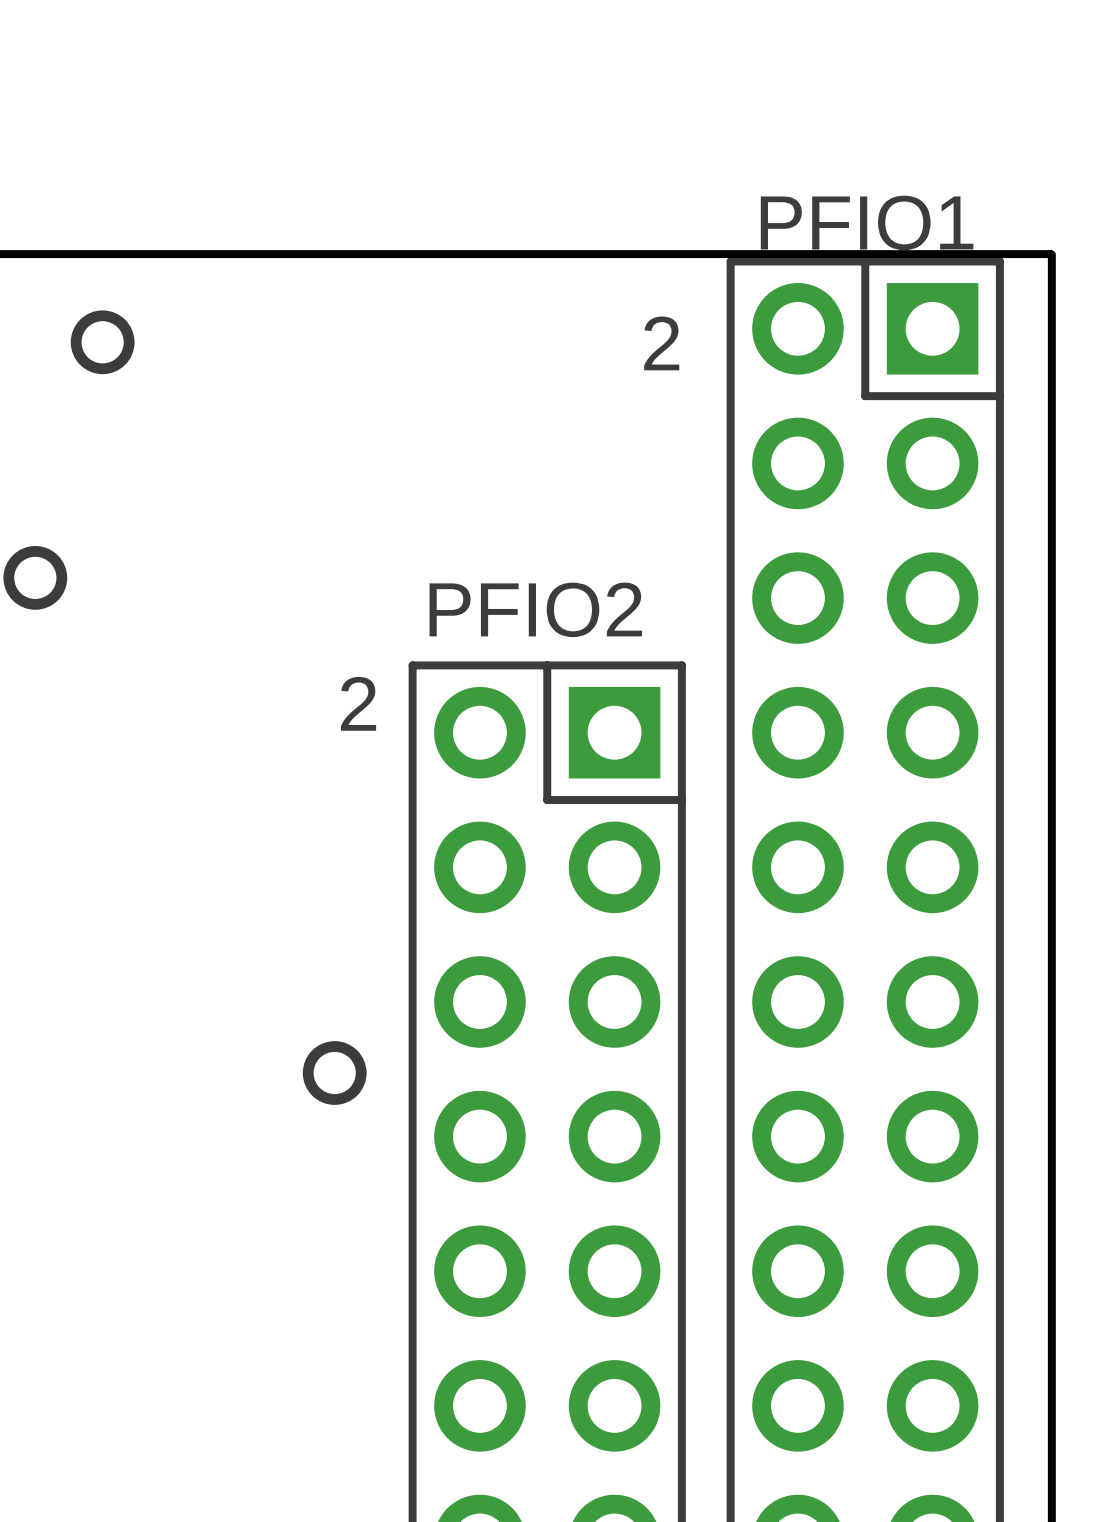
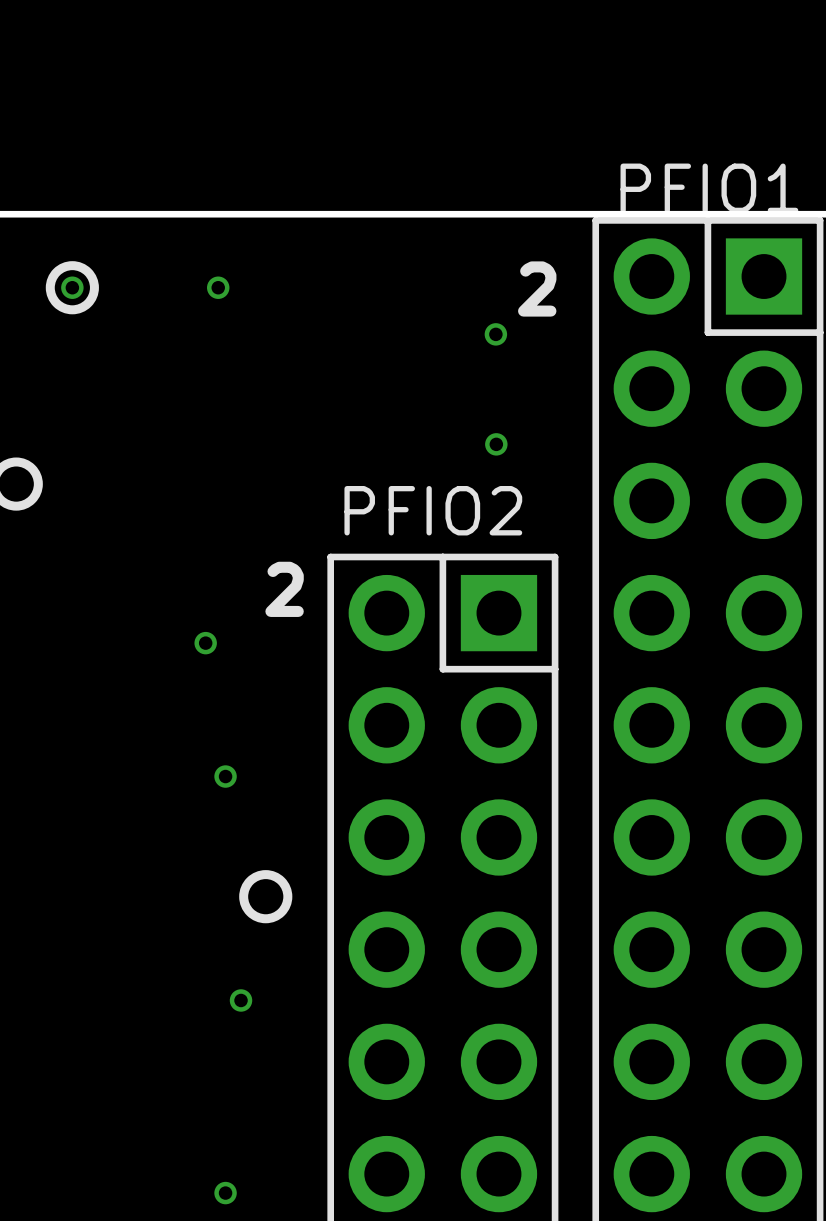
part: none -> (72, 287)
part: none -> (218, 287)
part: none -> (495, 334)
part: none -> (496, 444)
part: none -> (205, 643)
part: none -> (225, 776)
part: none -> (241, 1000)
part: none -> (225, 1193)

